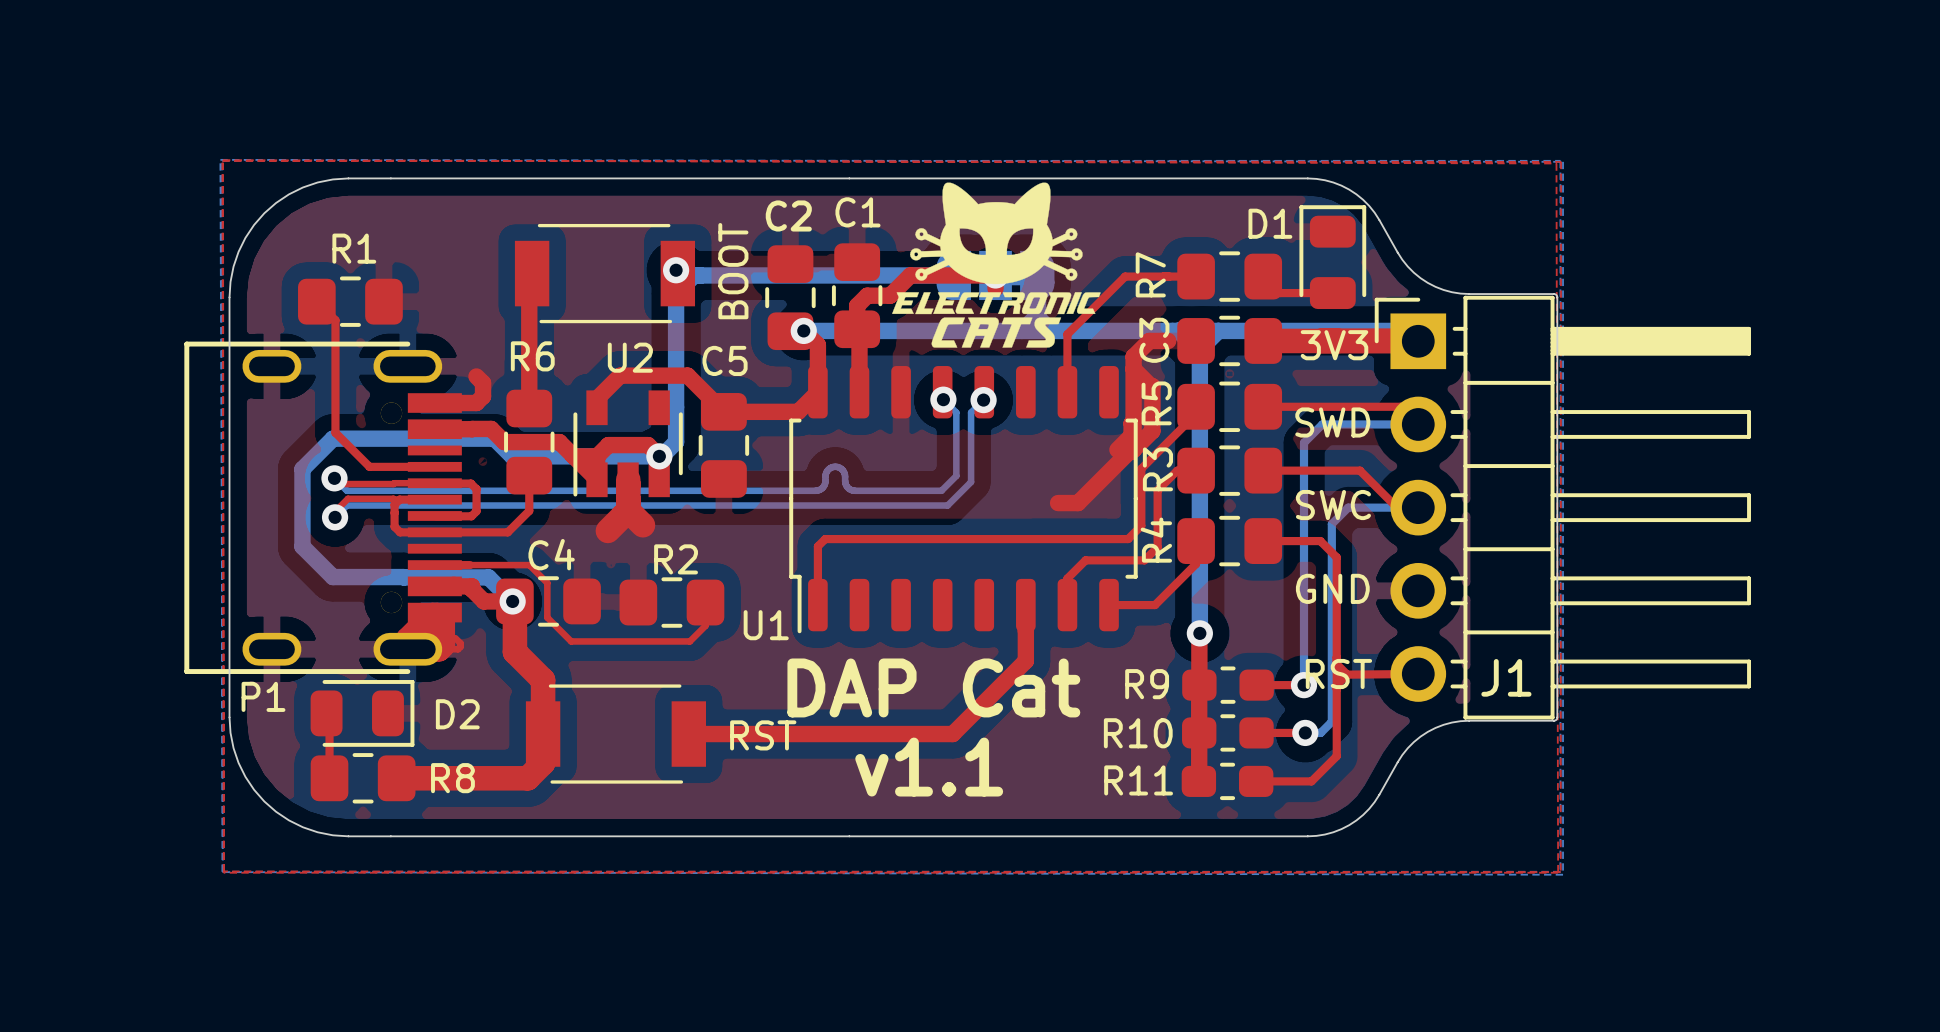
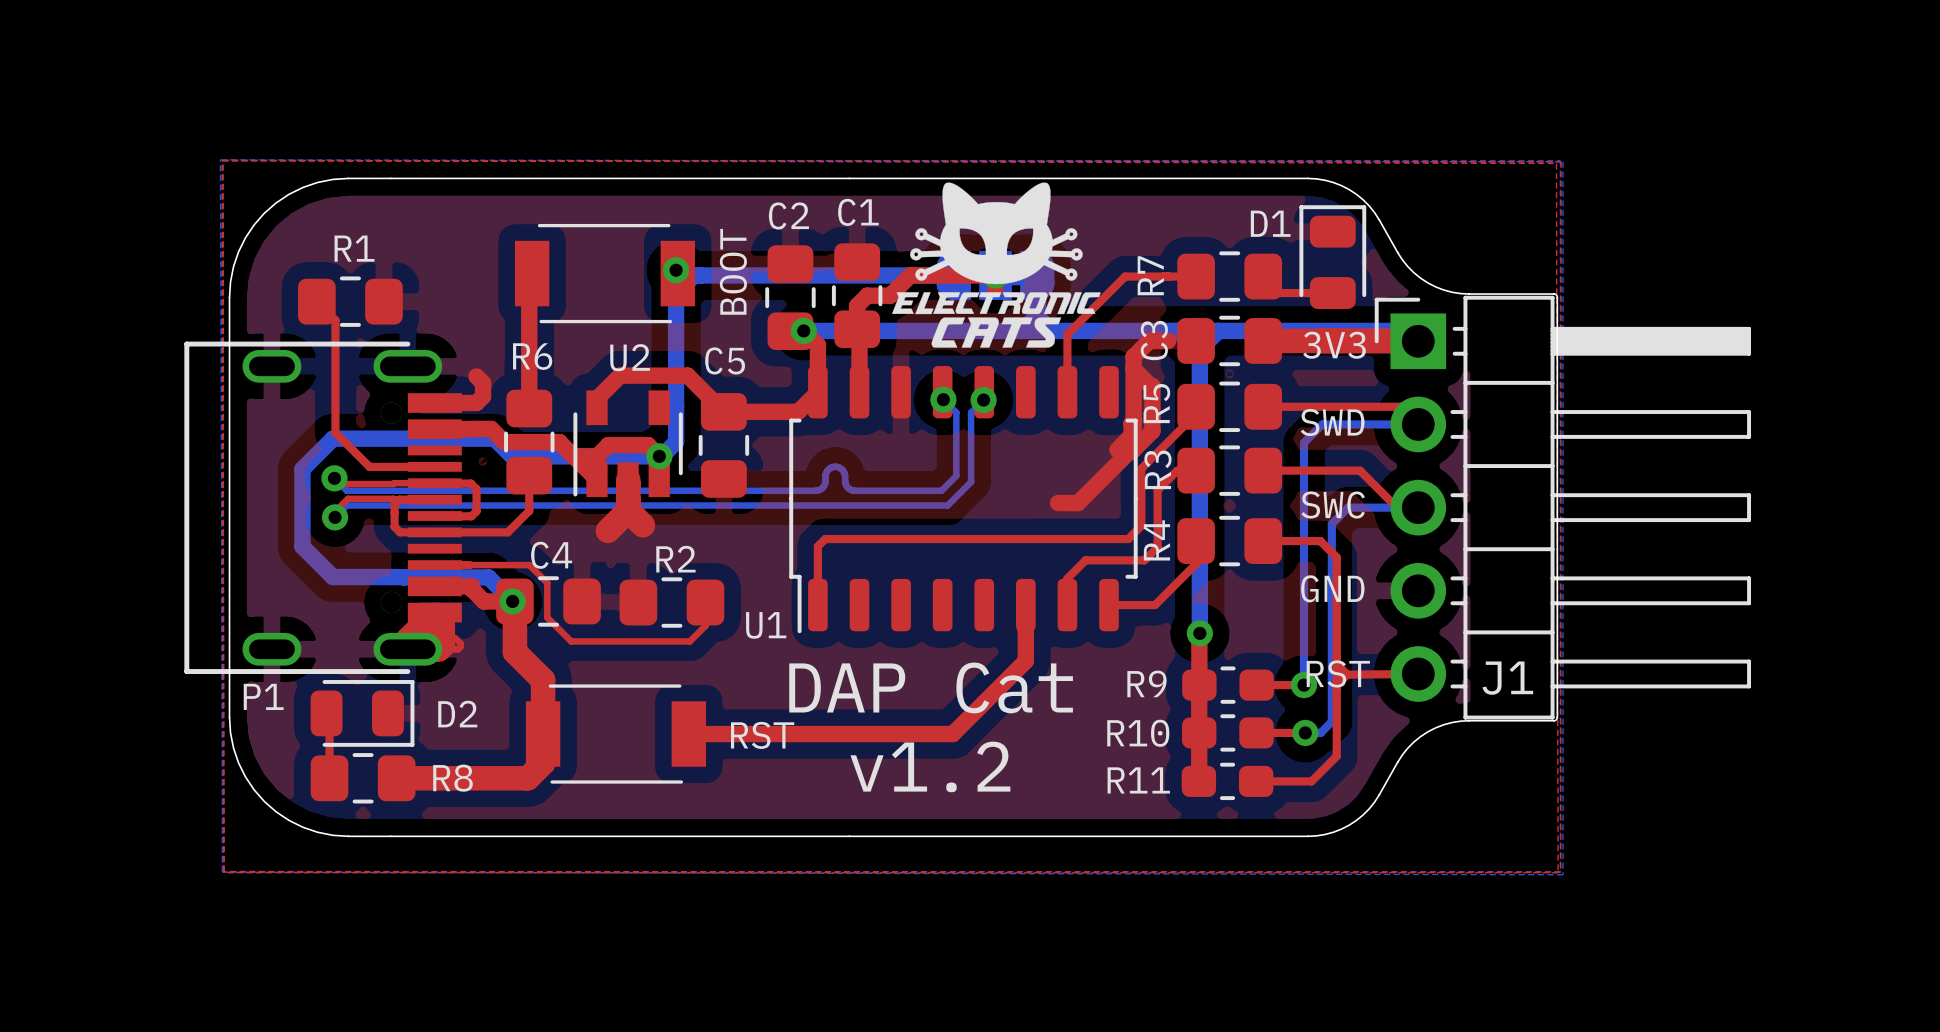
text: v1.1 (929, 767) -> v1.2 (930, 766)

